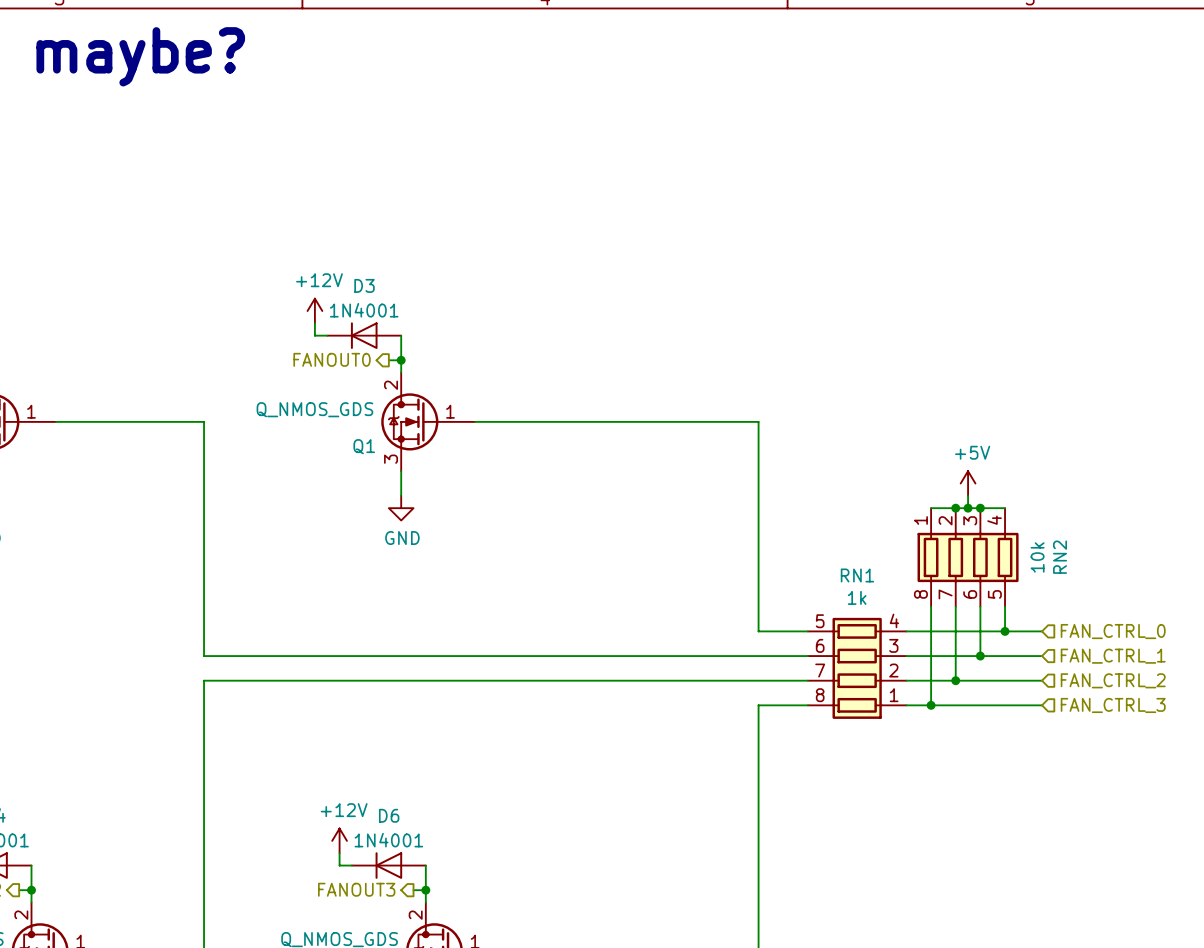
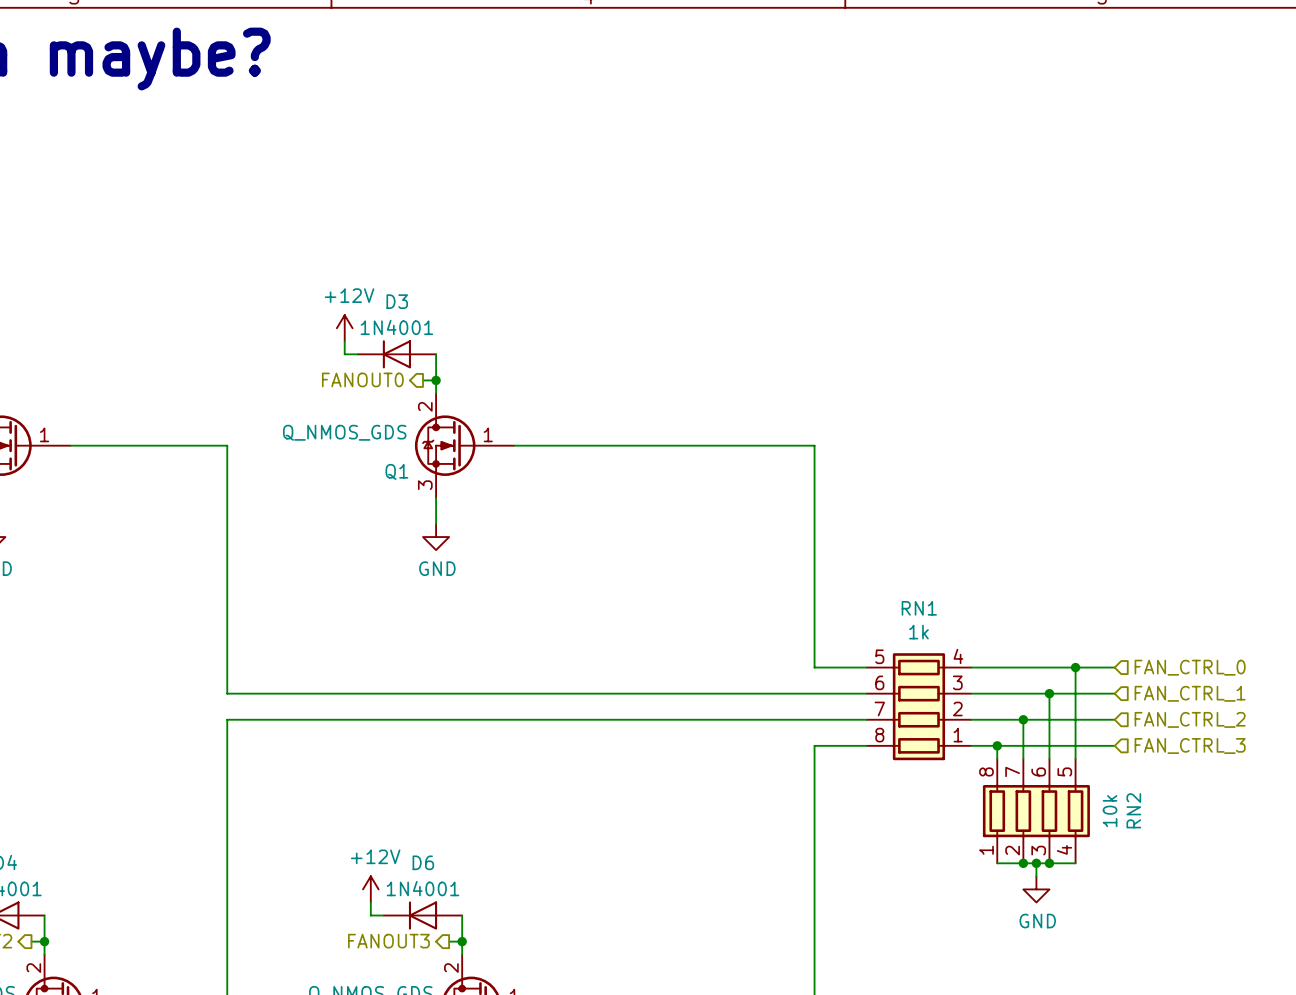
power symbol: +5V (968, 483) -> none
wire: (968, 495) (968, 508) -> none
wire: (931, 508) (1005, 508) -> none
junction: (955, 508) -> none
junction: (968, 508) -> none
junction: (980, 508) -> none
RN2 flip: as is (968, 557) -> up-down (1036, 811)
RN2 position: (968, 557) -> (1036, 811)
wire: (931, 606) (931, 705) -> (997, 758) (997, 745)
wire: (955, 606) (955, 680) -> (1023, 758) (1023, 719)
wire: (980, 606) (980, 656) -> (1049, 758) (1049, 693)
wire: (1005, 606) (1005, 631) -> (1075, 758) (1075, 667)
wire: none -> (997, 863) (1075, 863)
junction: none -> (1023, 863)
wire: none -> (1036, 863) (1036, 876)
junction: none -> (1036, 863)
junction: none -> (1049, 863)
power symbol: none -> GND (1036, 889)

